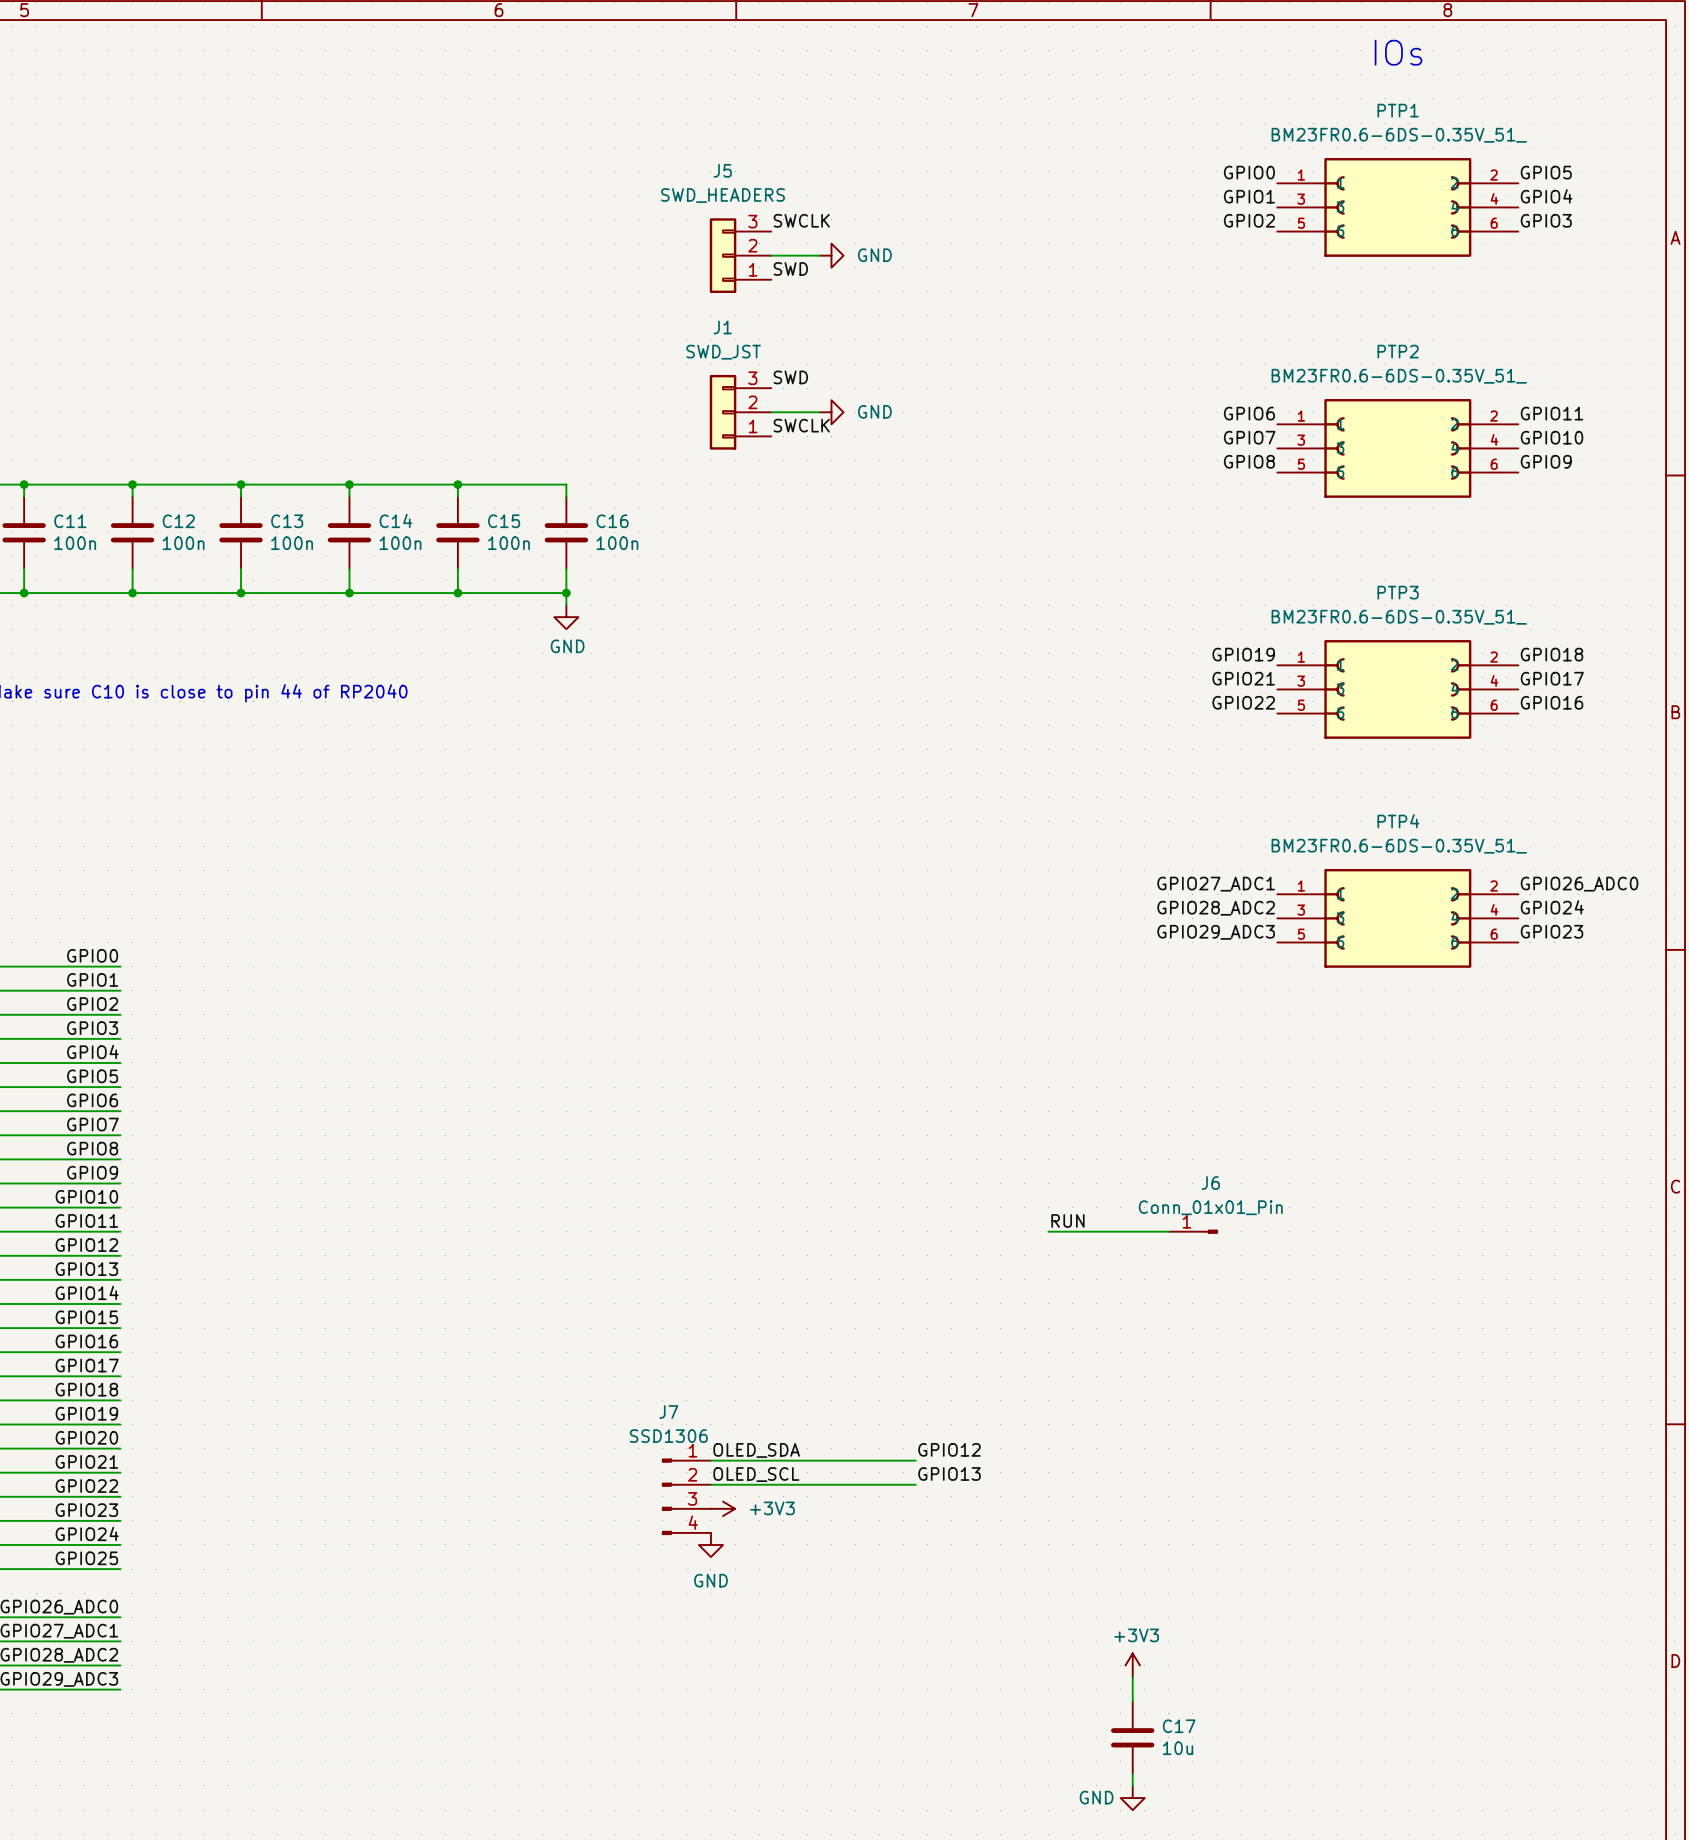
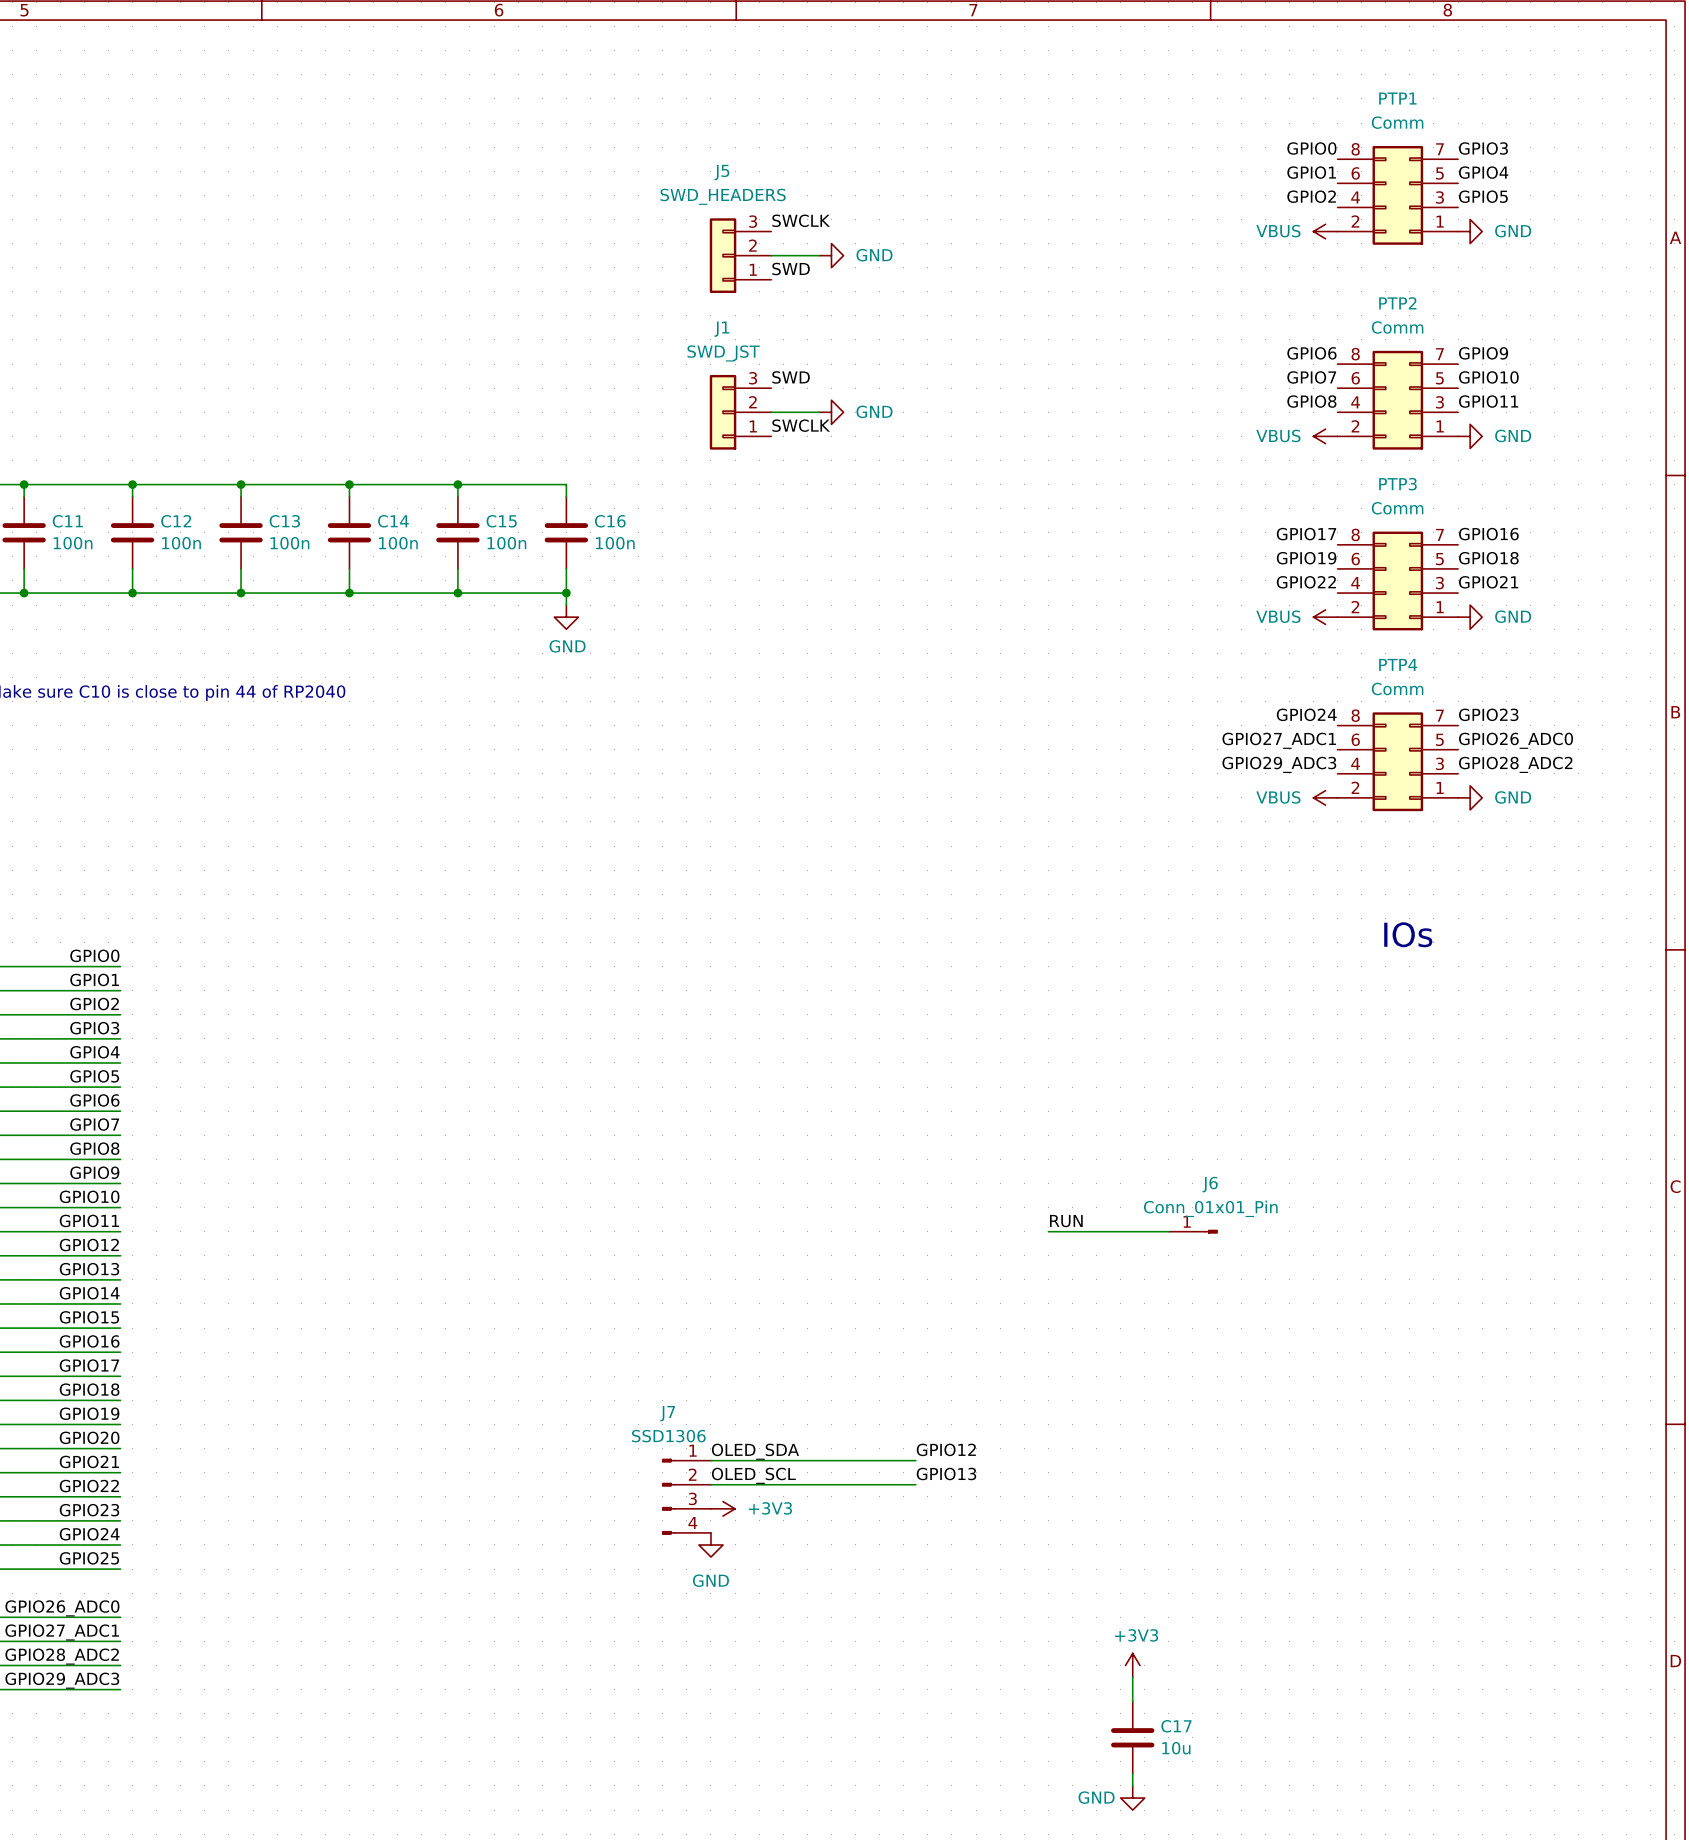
text: IOs (1398, 52) -> none
PTP1 value: BM23FR0.6-6DS-0.35V_51_ (1399, 135) -> Comm (1397, 122)
PTP1 symbol: [1277, 158, 1519, 257] -> [1337, 145, 1459, 245]
label position: GPIO0 (1249, 172) -> GPIO0 (1311, 148)
label position: GPIO5 (1546, 172) -> GPIO5 (1483, 196)
label position: GPIO1 (1249, 196) -> GPIO1 (1311, 172)
label position: GPIO4 (1546, 196) -> GPIO4 (1483, 172)
label position: GPIO2 (1249, 220) -> GPIO2 (1311, 196)
label position: GPIO3 (1546, 220) -> GPIO3 (1483, 148)
power symbol: none -> VBUS (1325, 231)
power symbol: none -> GND (1470, 231)
PTP2 value: BM23FR0.6-6DS-0.35V_51_ (1399, 376) -> Comm (1397, 327)
PTP2 symbol: [1277, 399, 1519, 498] -> [1337, 350, 1459, 450]
label position: GPIO6 (1249, 413) -> GPIO6 (1311, 353)
label position: GPIO11 (1551, 413) -> GPIO11 (1488, 401)
power symbol: none -> VBUS (1325, 436)
power symbol: none -> GND (1470, 436)
label position: GPIO7 (1249, 437) -> GPIO7 (1311, 377)
label position: GPIO10 (1551, 437) -> GPIO10 (1488, 377)
label position: GPIO8 (1249, 461) -> GPIO8 (1311, 401)
label position: GPIO9 (1546, 461) -> GPIO9 (1483, 353)
power symbol: none -> VBUS (1325, 617)
PTP3 value: BM23FR0.6-6DS-0.35V_51_ (1399, 617) -> Comm (1397, 508)
power symbol: none -> GND (1470, 617)
PTP3 symbol: [1277, 640, 1519, 739] -> [1337, 531, 1459, 631]
label position: GPIO19 (1243, 654) -> GPIO19 (1306, 558)
label position: GPIO18 (1551, 654) -> GPIO18 (1488, 558)
label position: GPIO21 (1243, 678) -> GPIO21 (1488, 582)
label position: GPIO17 (1552, 678) -> GPIO17 (1306, 534)
label position: GPIO22 (1243, 702) -> GPIO22 (1306, 582)
label position: GPIO16 (1551, 702) -> GPIO16 (1488, 534)
label: none -> GPIO24 (1306, 714)
power symbol: none -> VBUS (1325, 797)
power symbol: none -> GND (1470, 797)
PTP4 value: BM23FR0.6-6DS-0.35V_51_ (1399, 846) -> Comm (1397, 689)
PTP4 symbol: [1277, 868, 1519, 968] -> [1337, 712, 1459, 812]
label position: GPIO27_ADC1 (1216, 884) -> GPIO27_ADC1 (1279, 740)
label position: GPIO26_ADC0 (1579, 884) -> GPIO26_ADC0 (1516, 740)
label: GPIO24 (1552, 907) -> none
label position: GPIO28_ADC2 (1216, 908) -> GPIO28_ADC2 (1515, 764)
label position: GPIO23 (1551, 931) -> GPIO23 (1488, 714)
label position: GPIO29_ADC3 (1216, 932) -> GPIO29_ADC3 (1279, 764)
text: none -> IOs (1408, 934)

